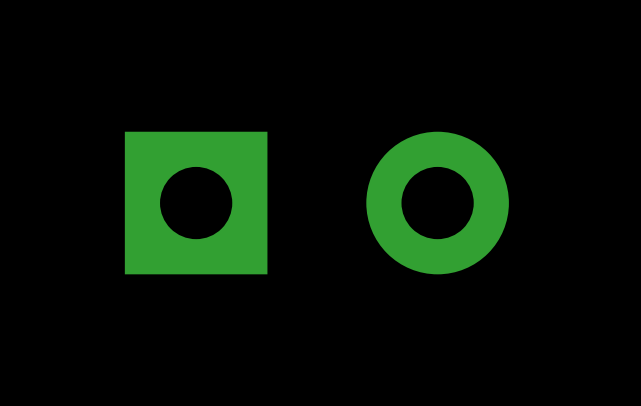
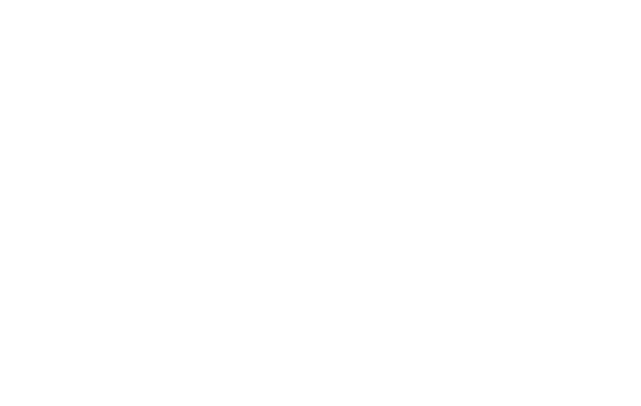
part: (316, 203) -> none

